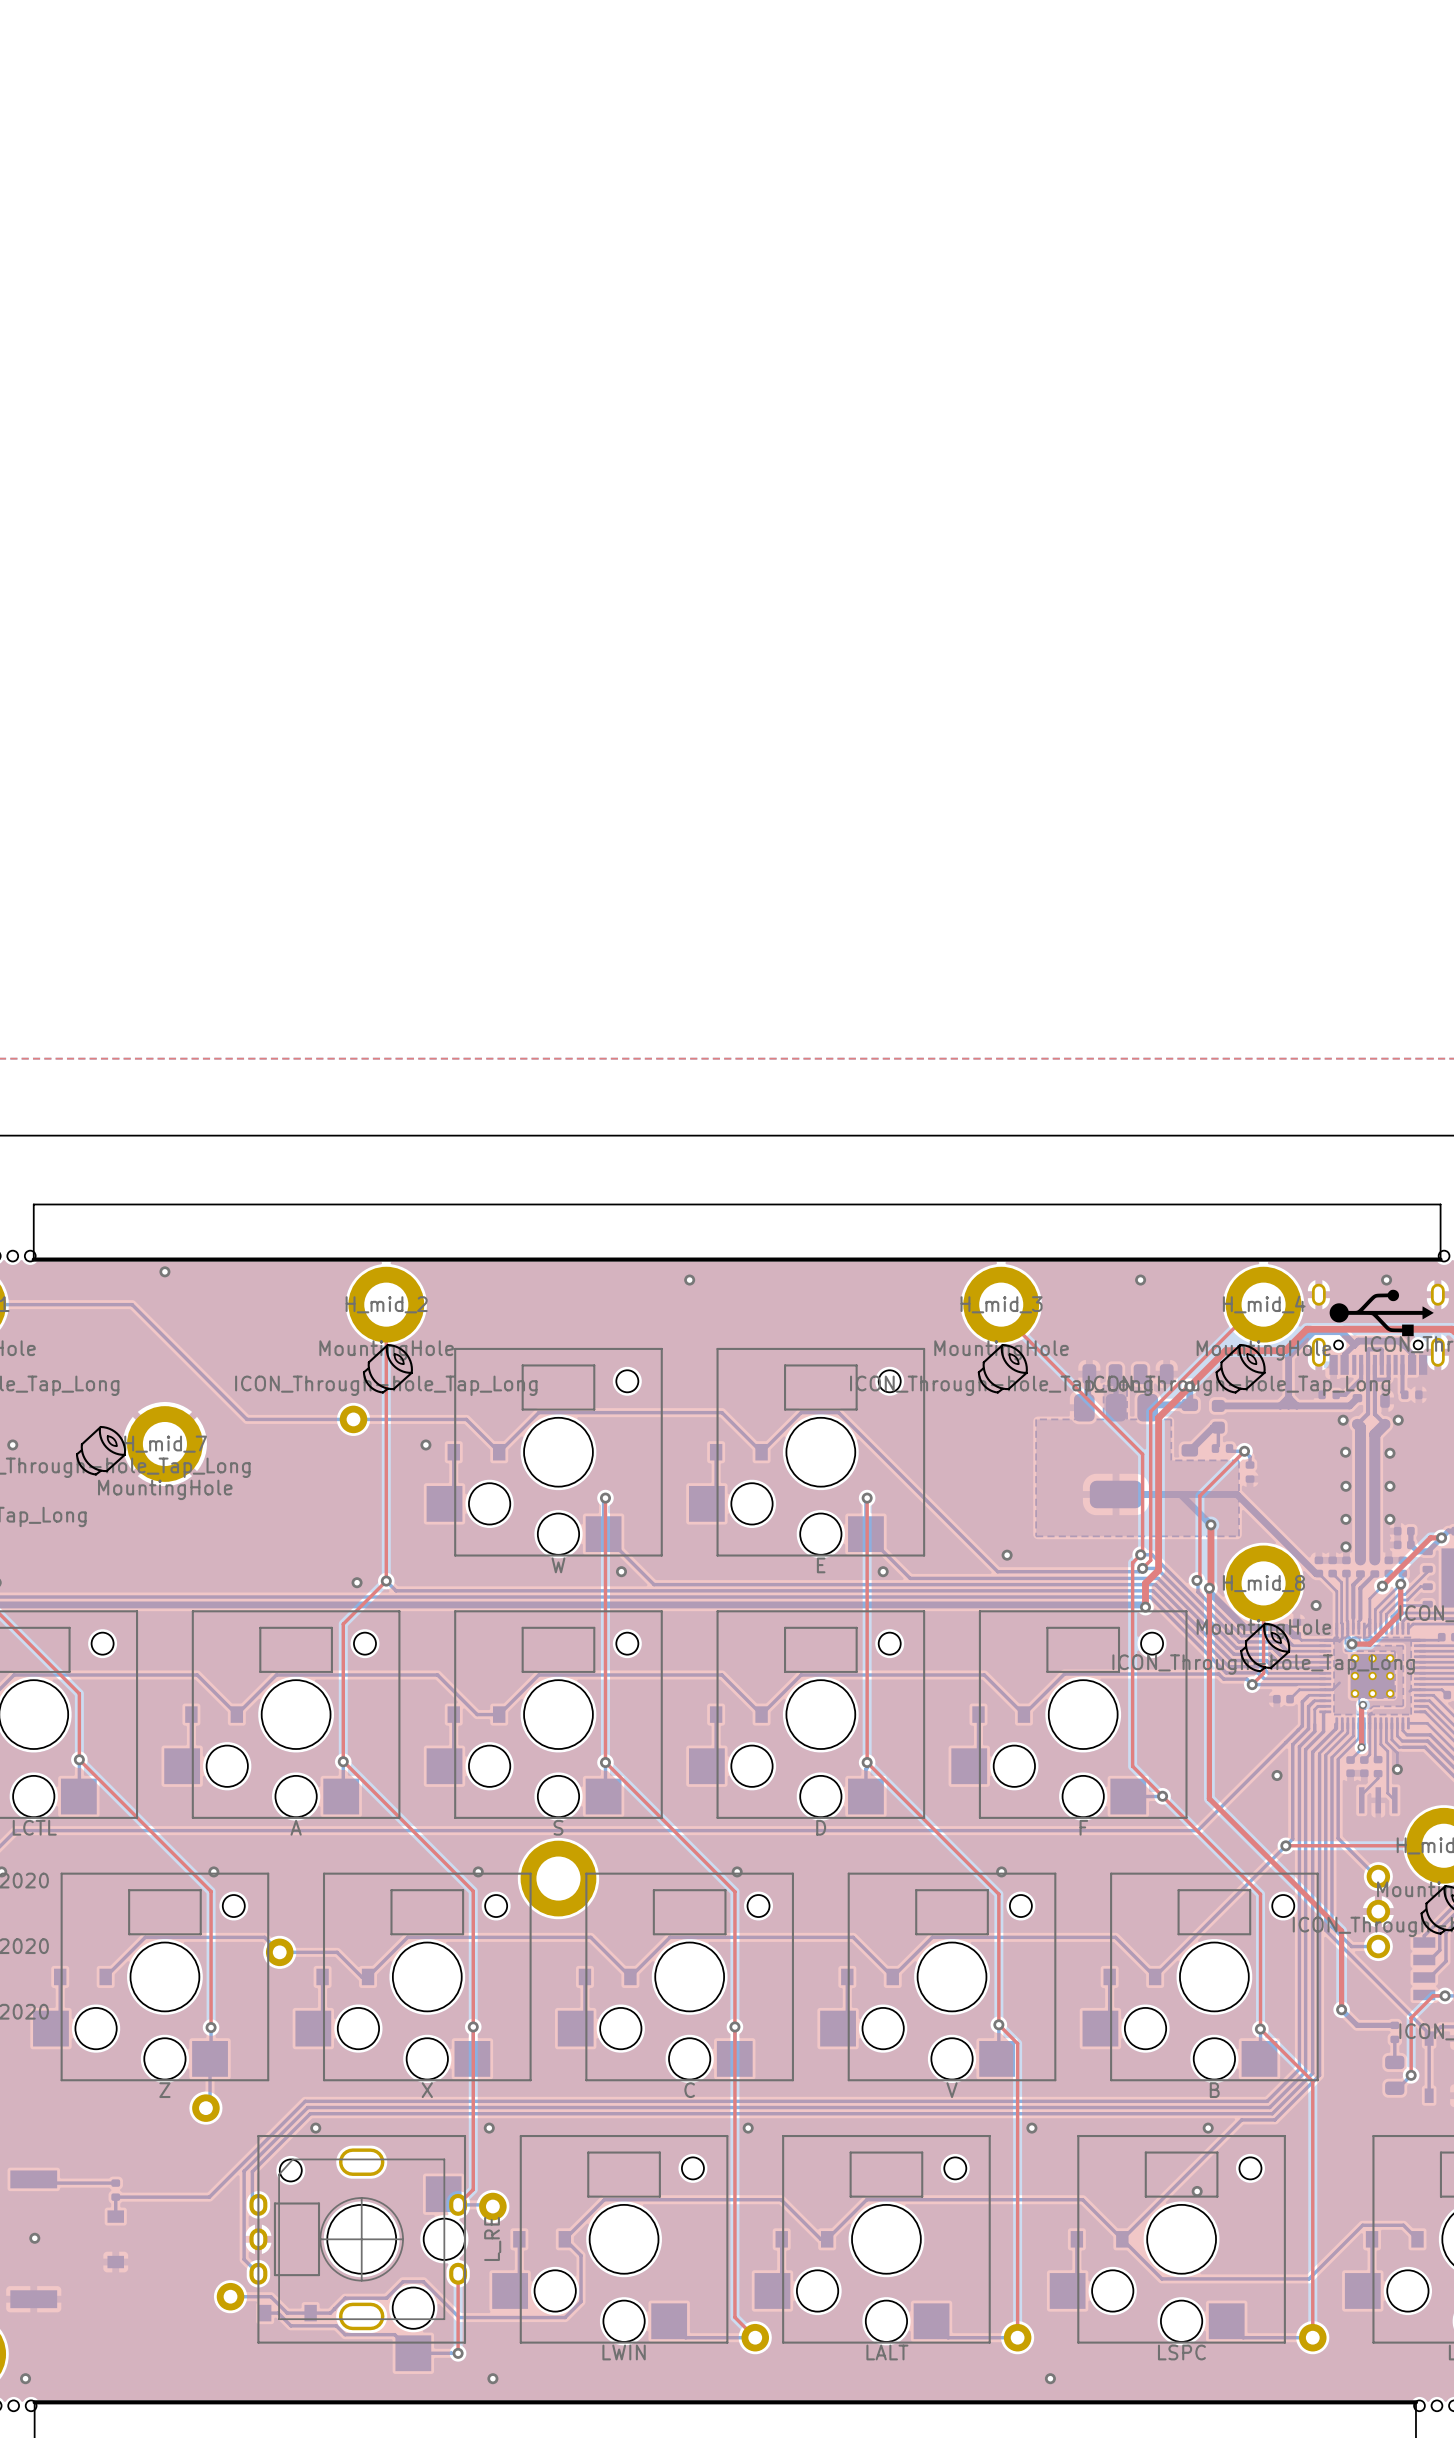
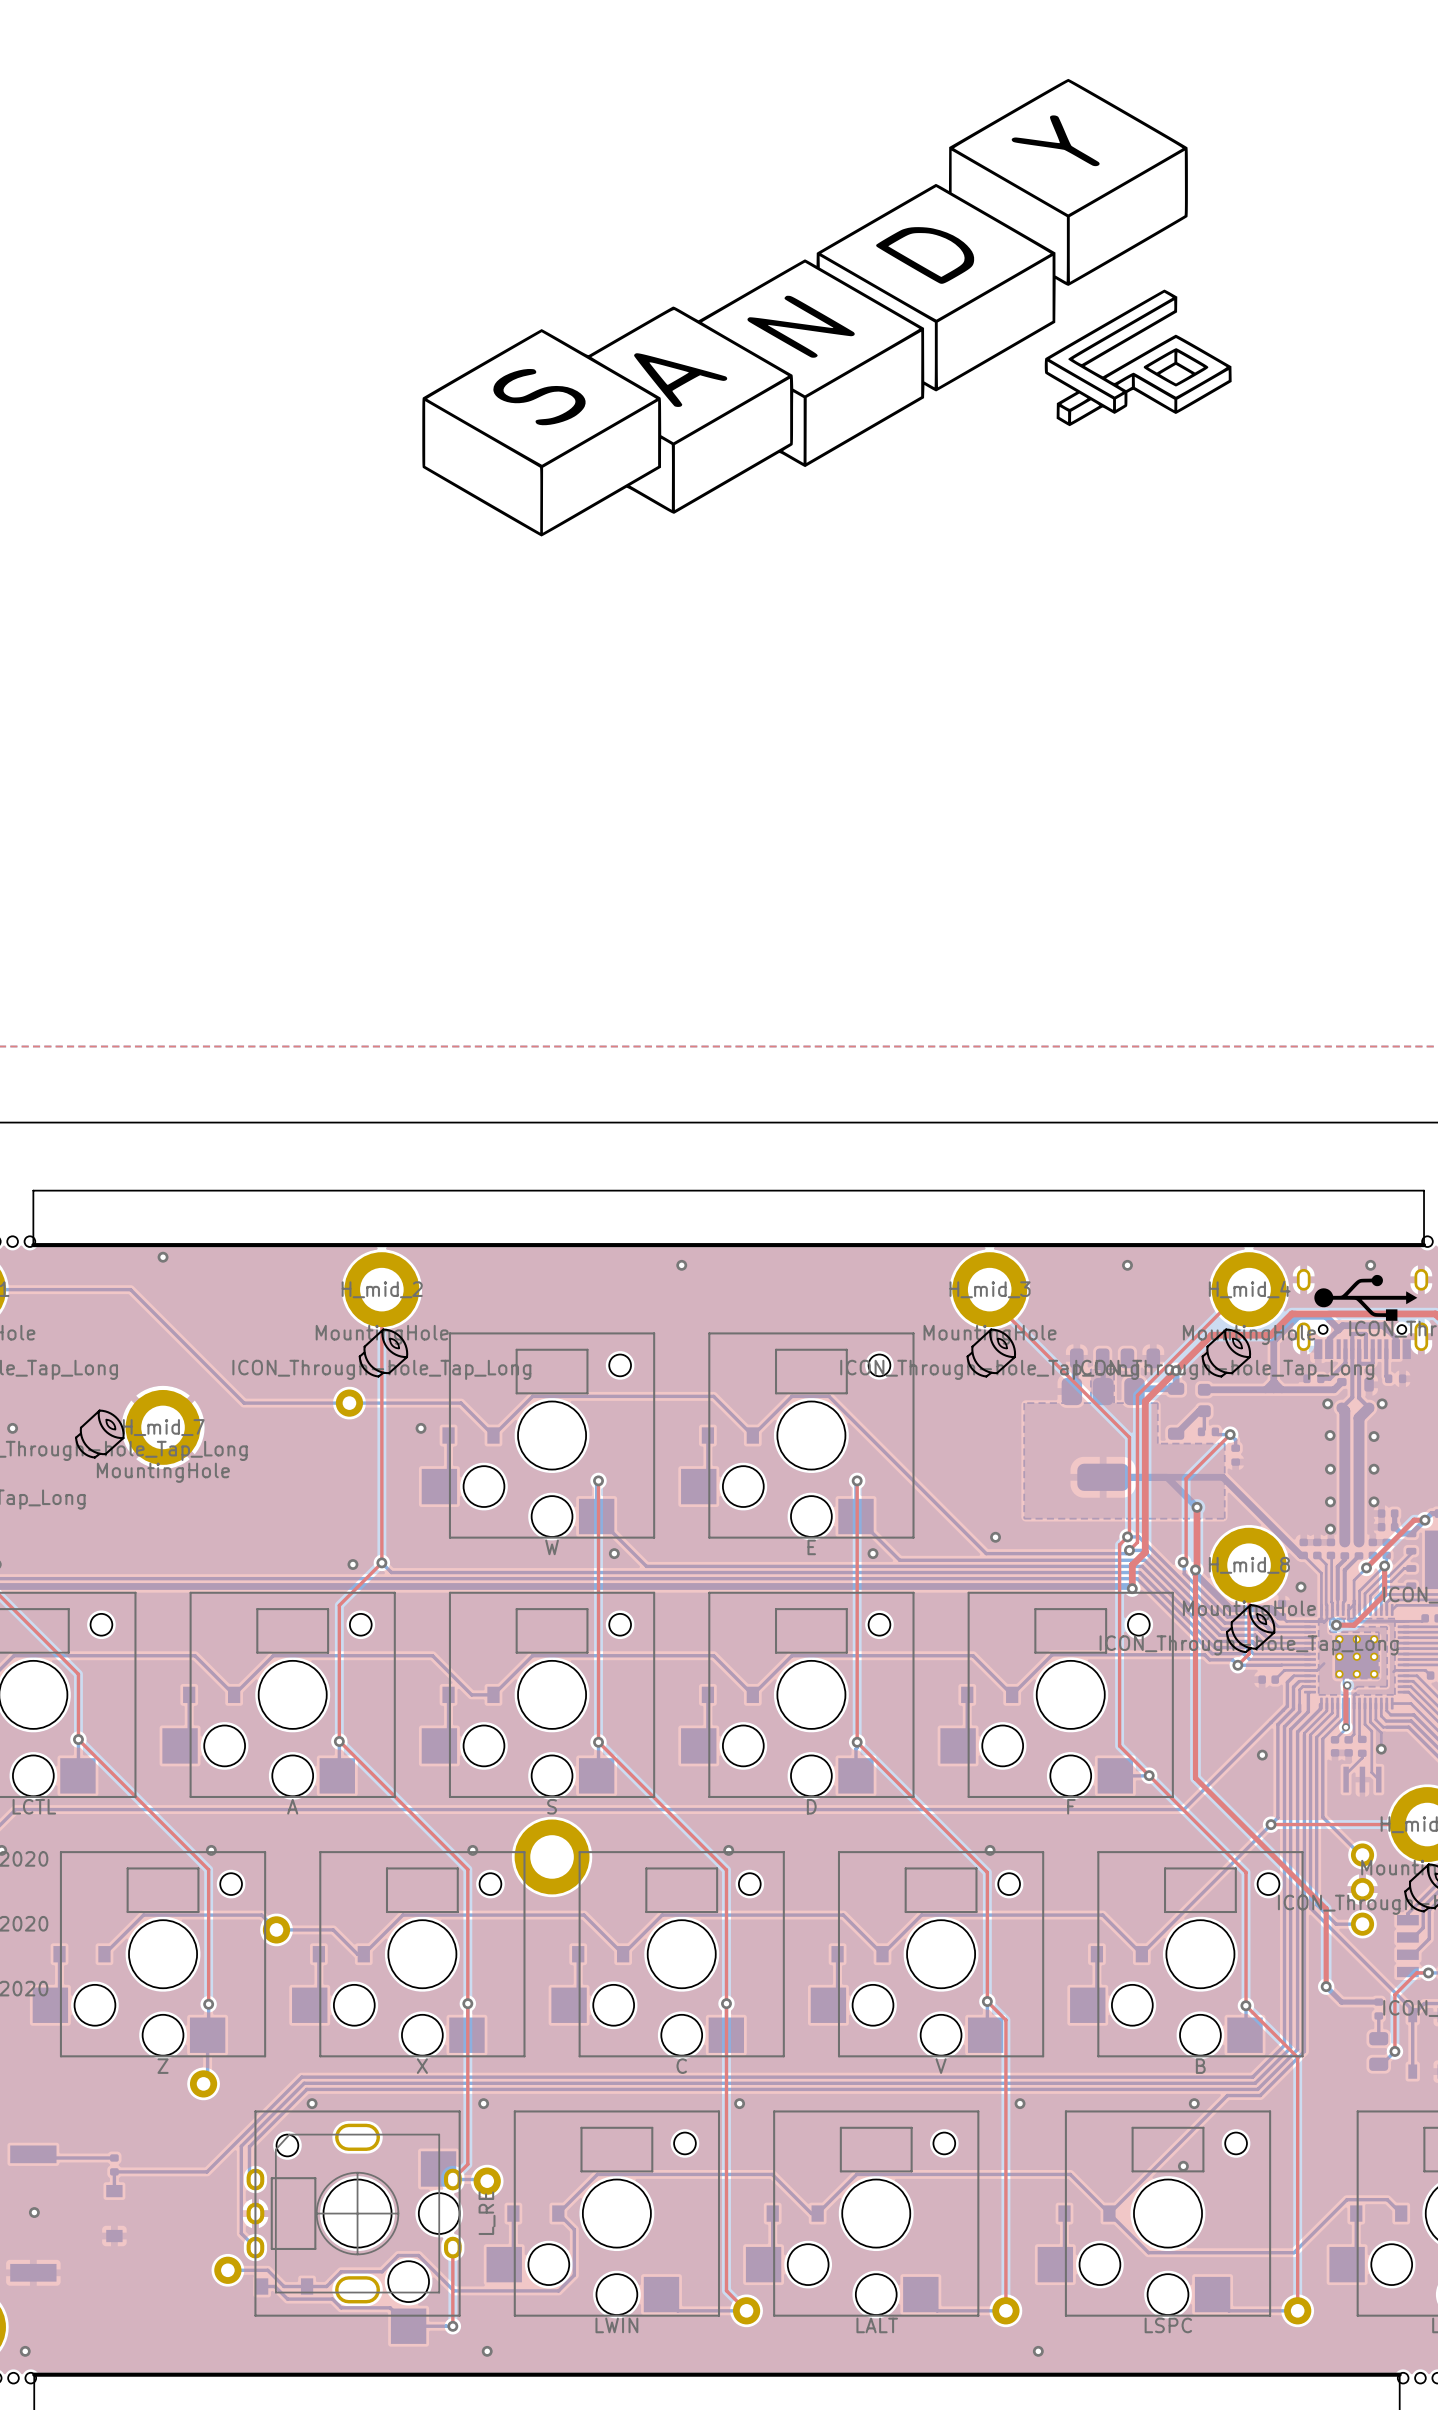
drawing: none -> [422, 78, 1232, 537]

